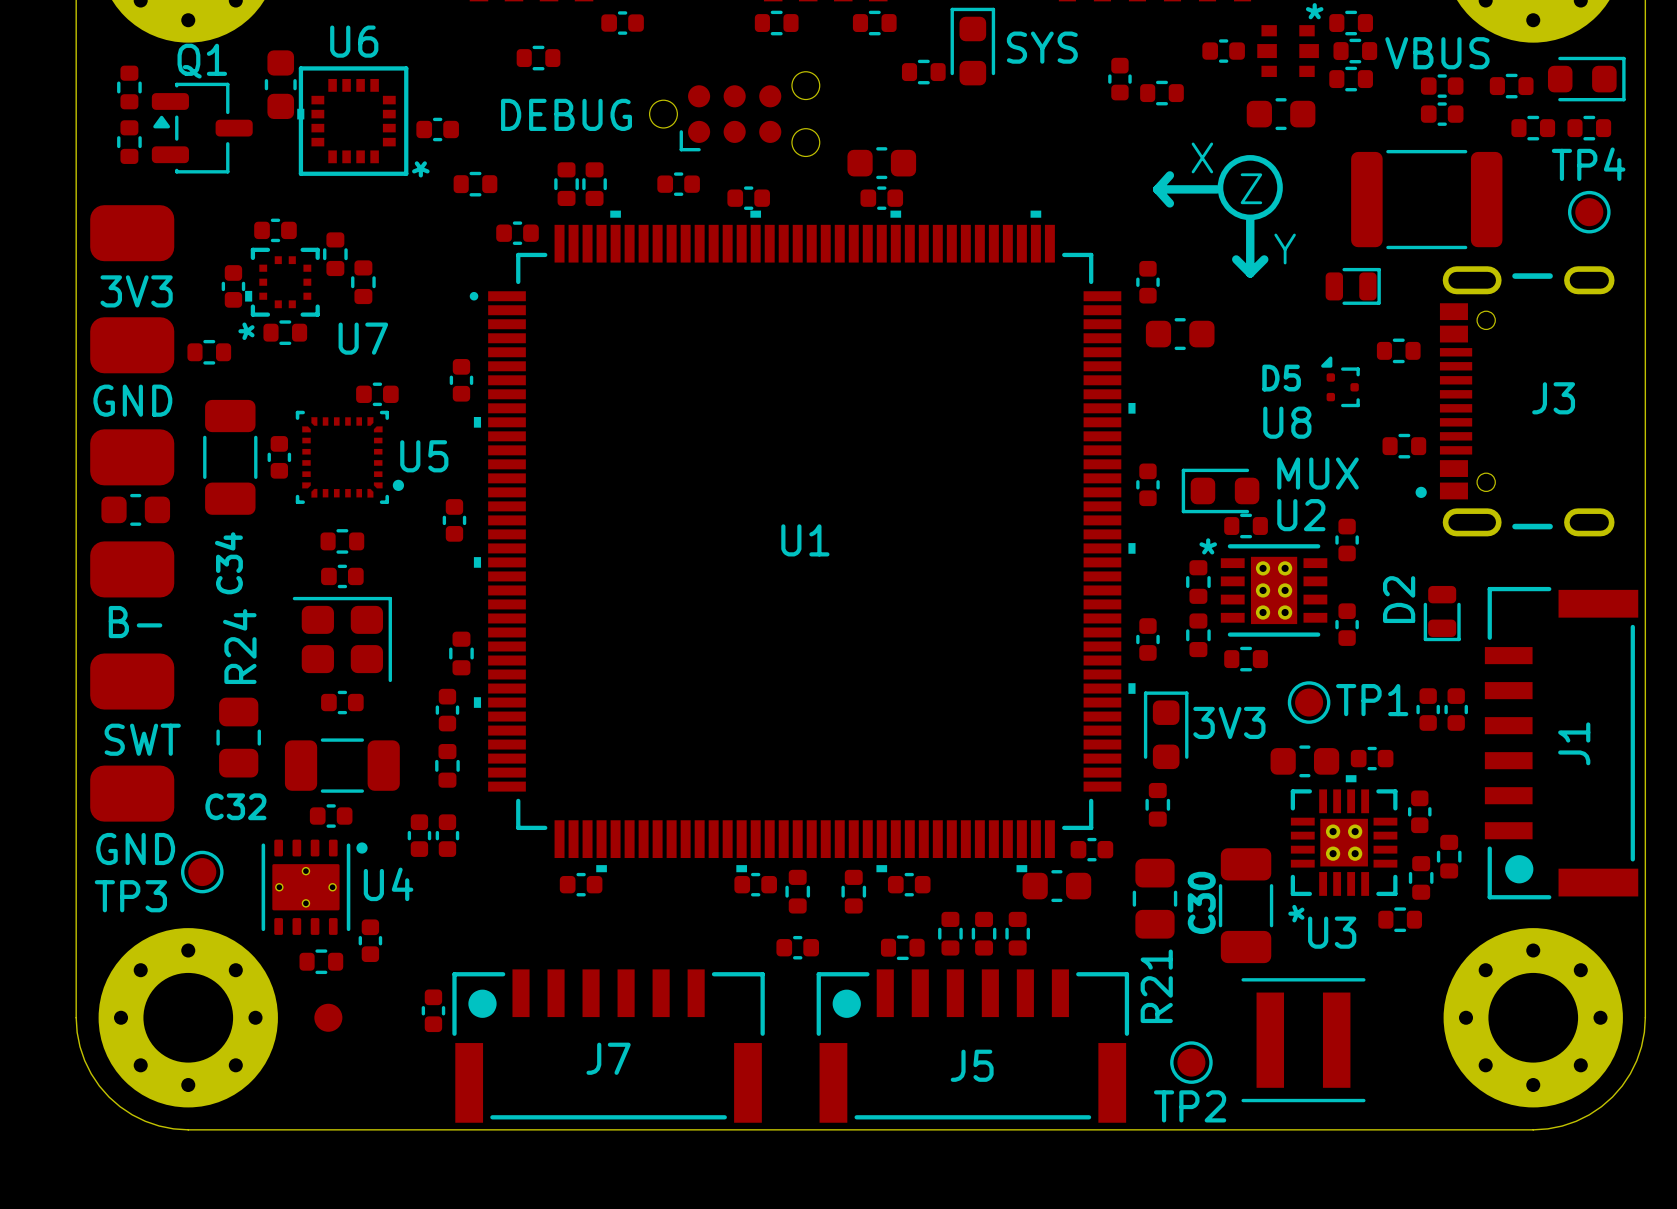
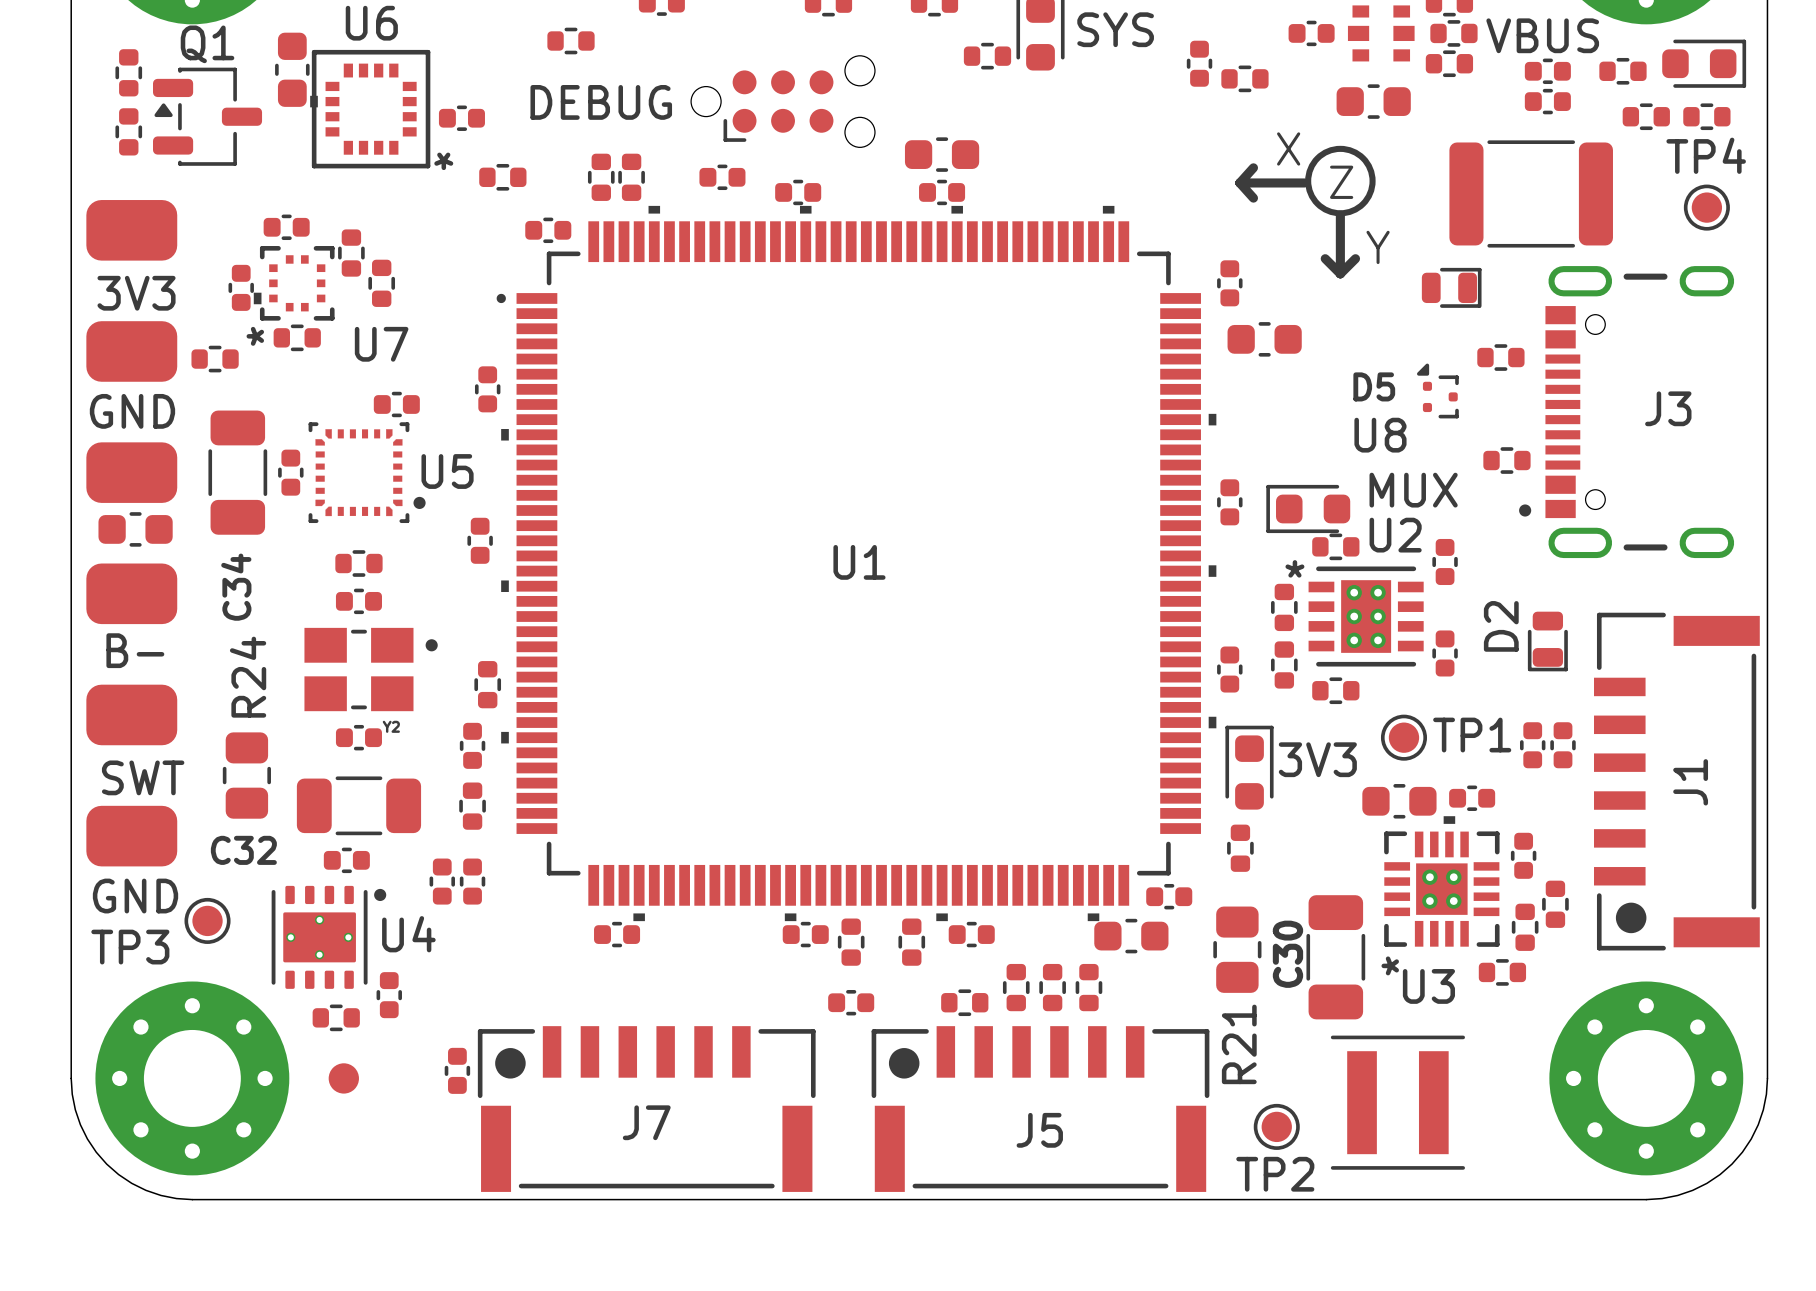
part: (342, 639) -> none
Y2: none -> (371, 669)

